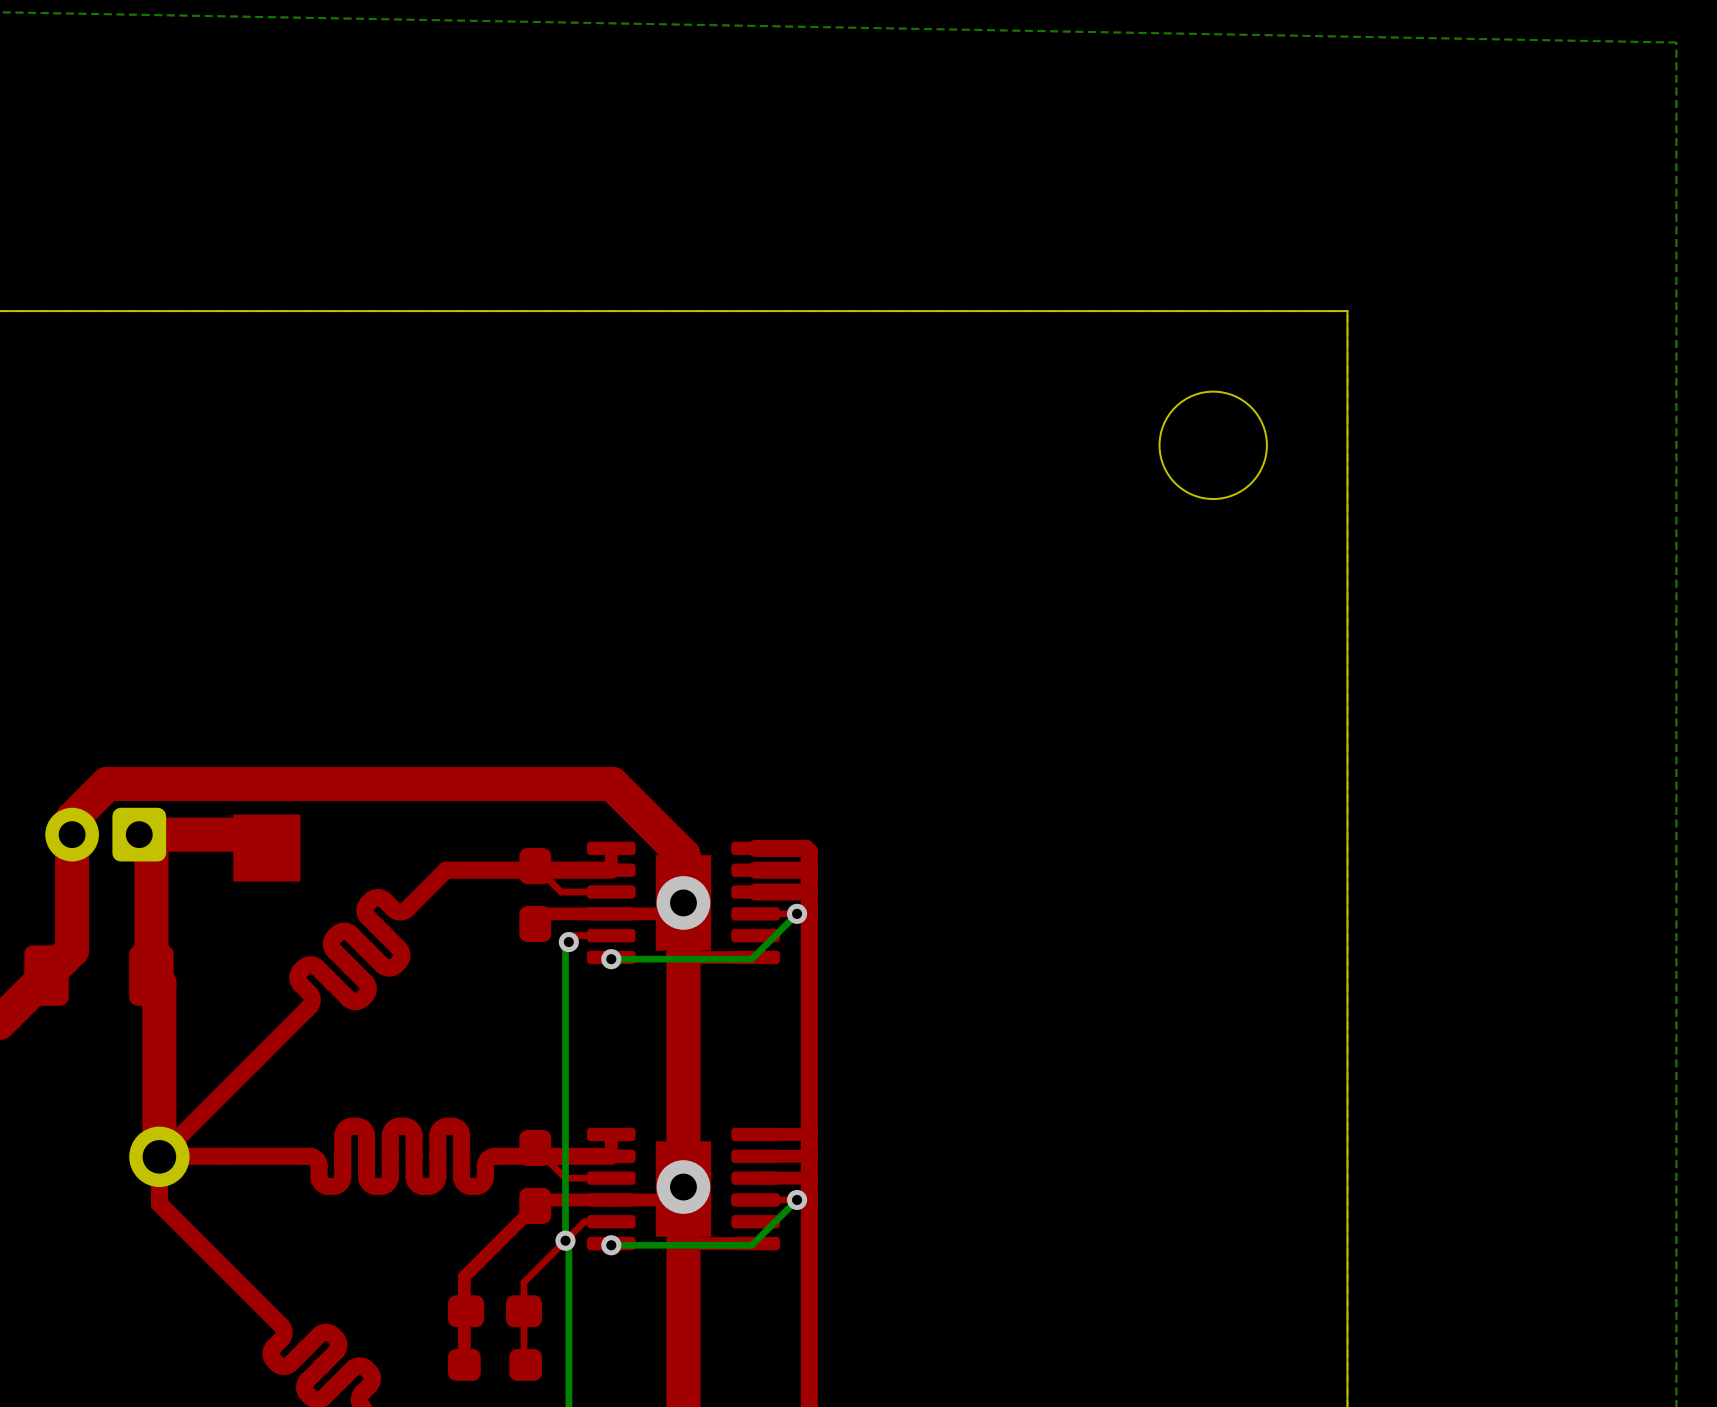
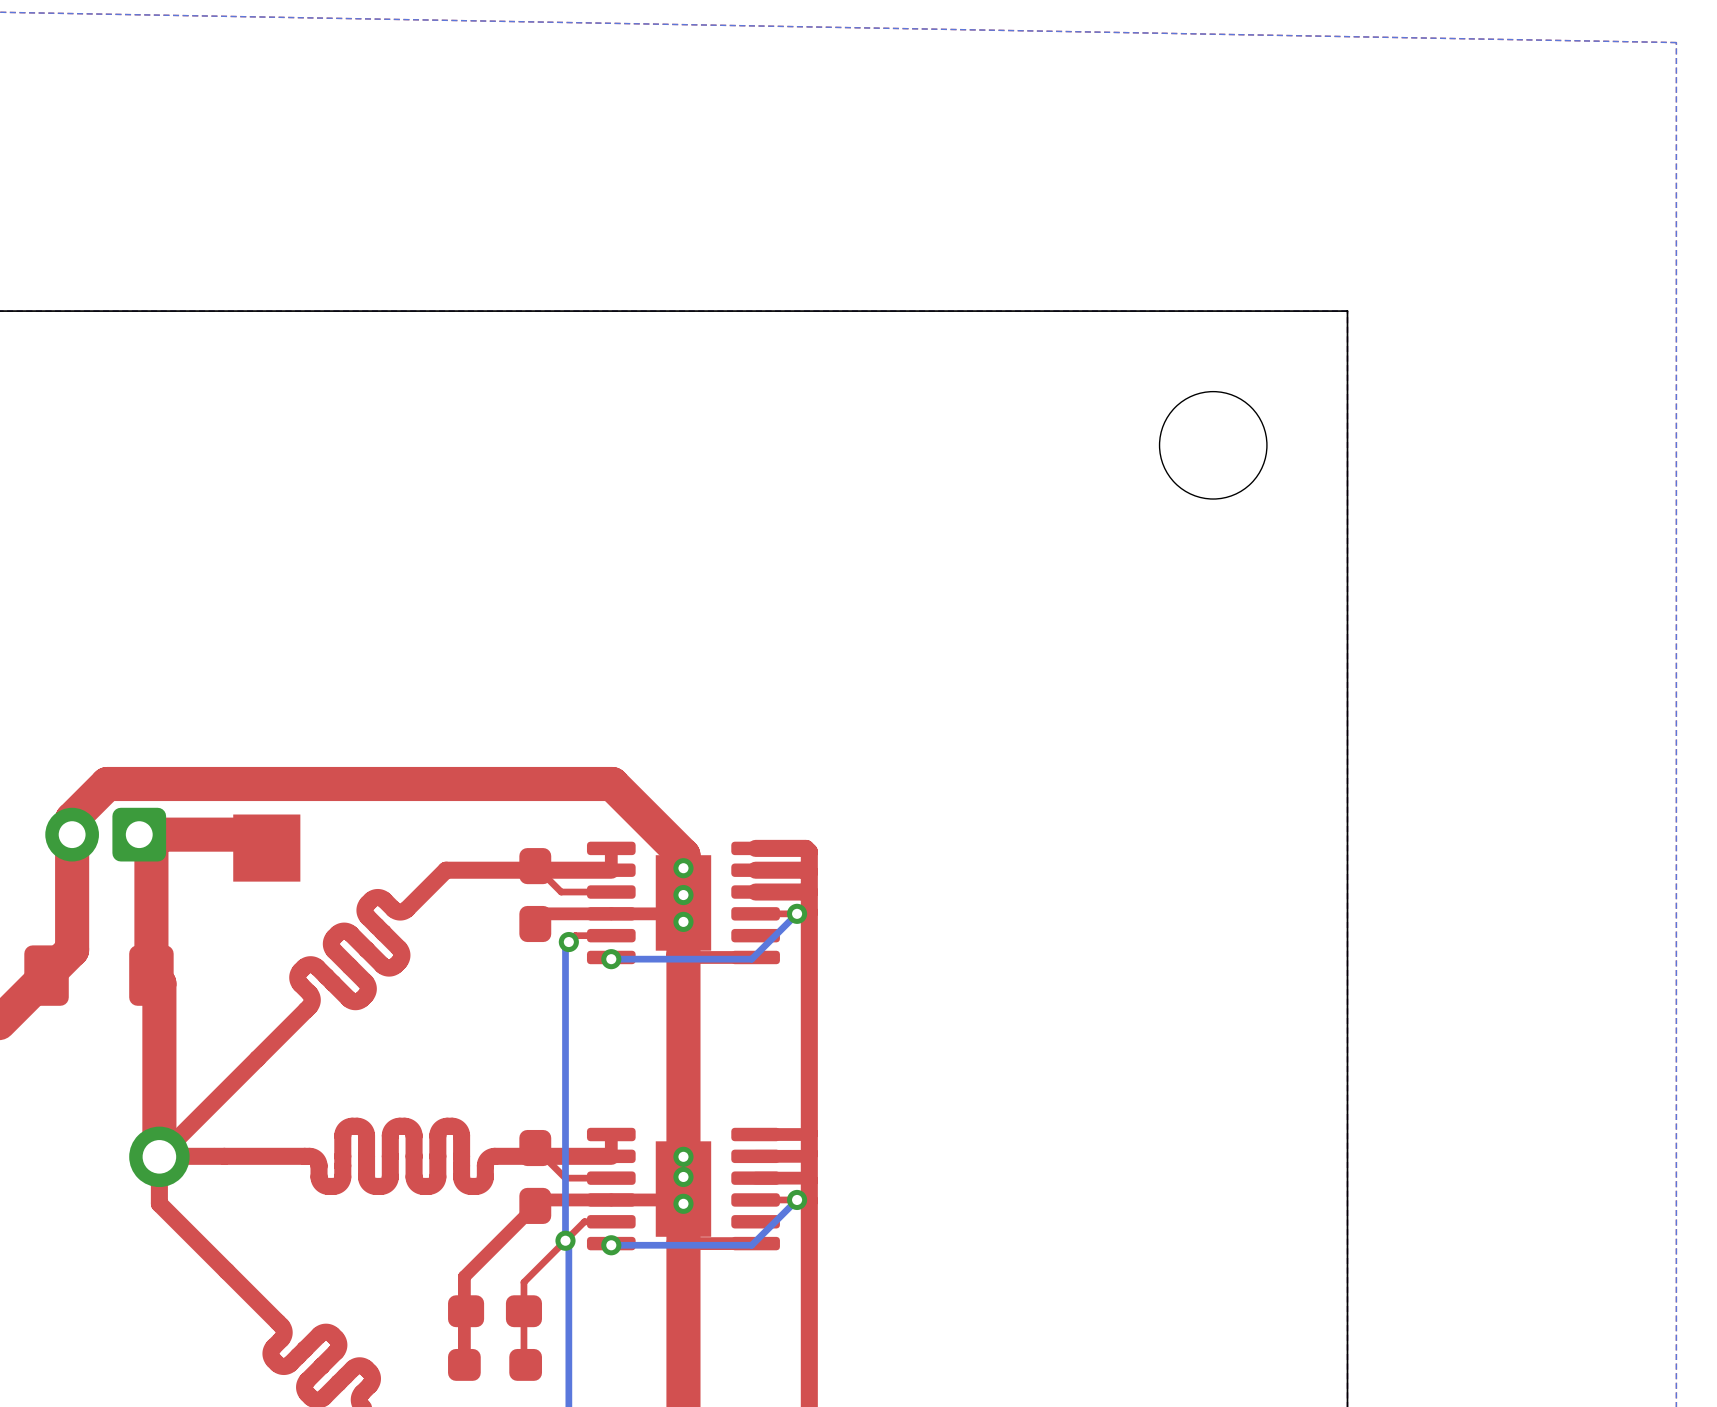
via: none -> (683, 868)
via size: [656, 876, 711, 930] -> [673, 884, 694, 906]
via: none -> (683, 921)
via: none -> (683, 1156)
via: none -> (683, 1176)
via: (683, 1187) -> none
via: none -> (683, 1203)

